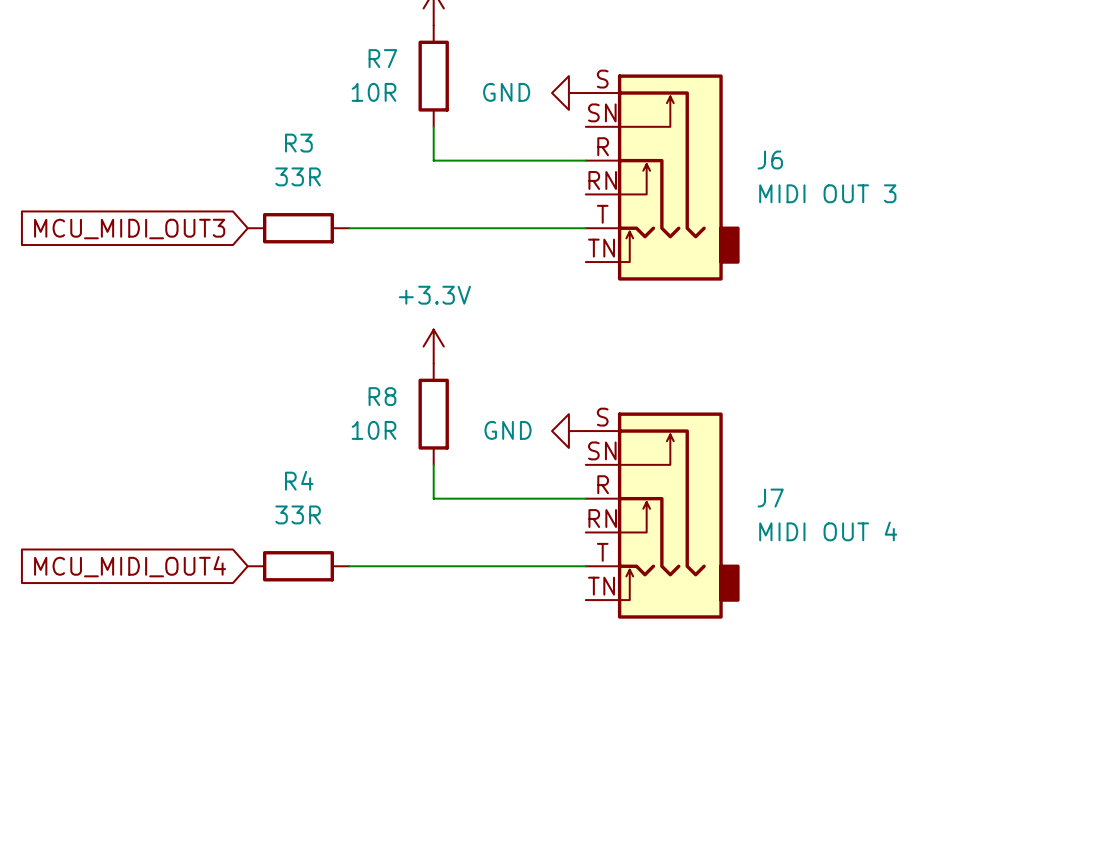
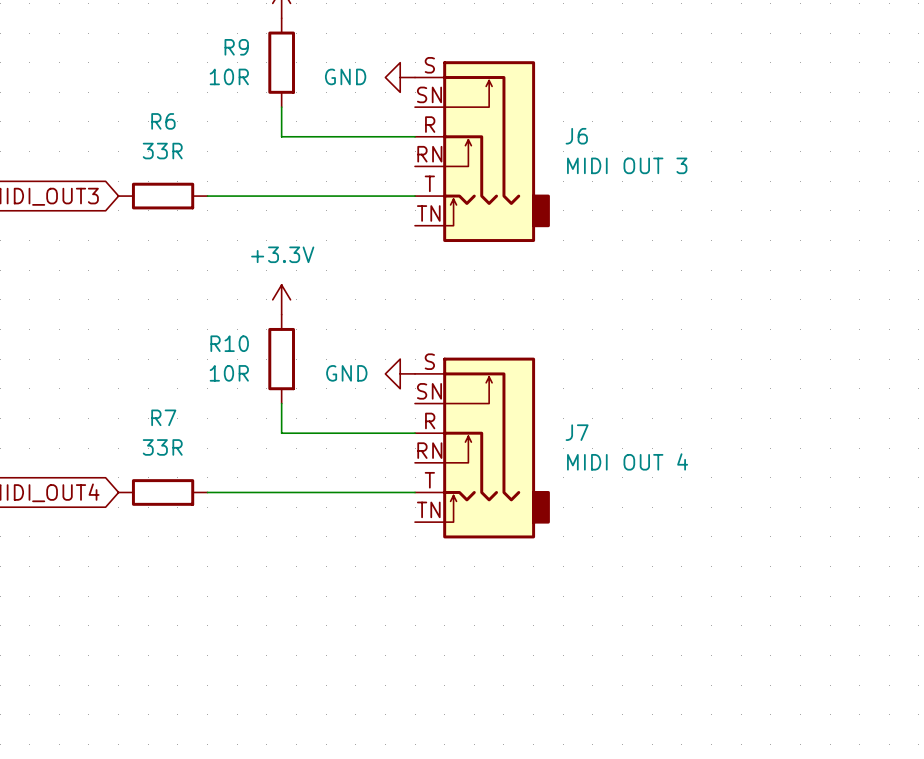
R7 name: R7 (382, 58) -> R9 (236, 47)
R3 name: R3 (298, 143) -> R6 (163, 121)
R8 name: R8 (382, 396) -> R10 (229, 343)
R4 name: R4 (299, 480) -> R7 (163, 417)

